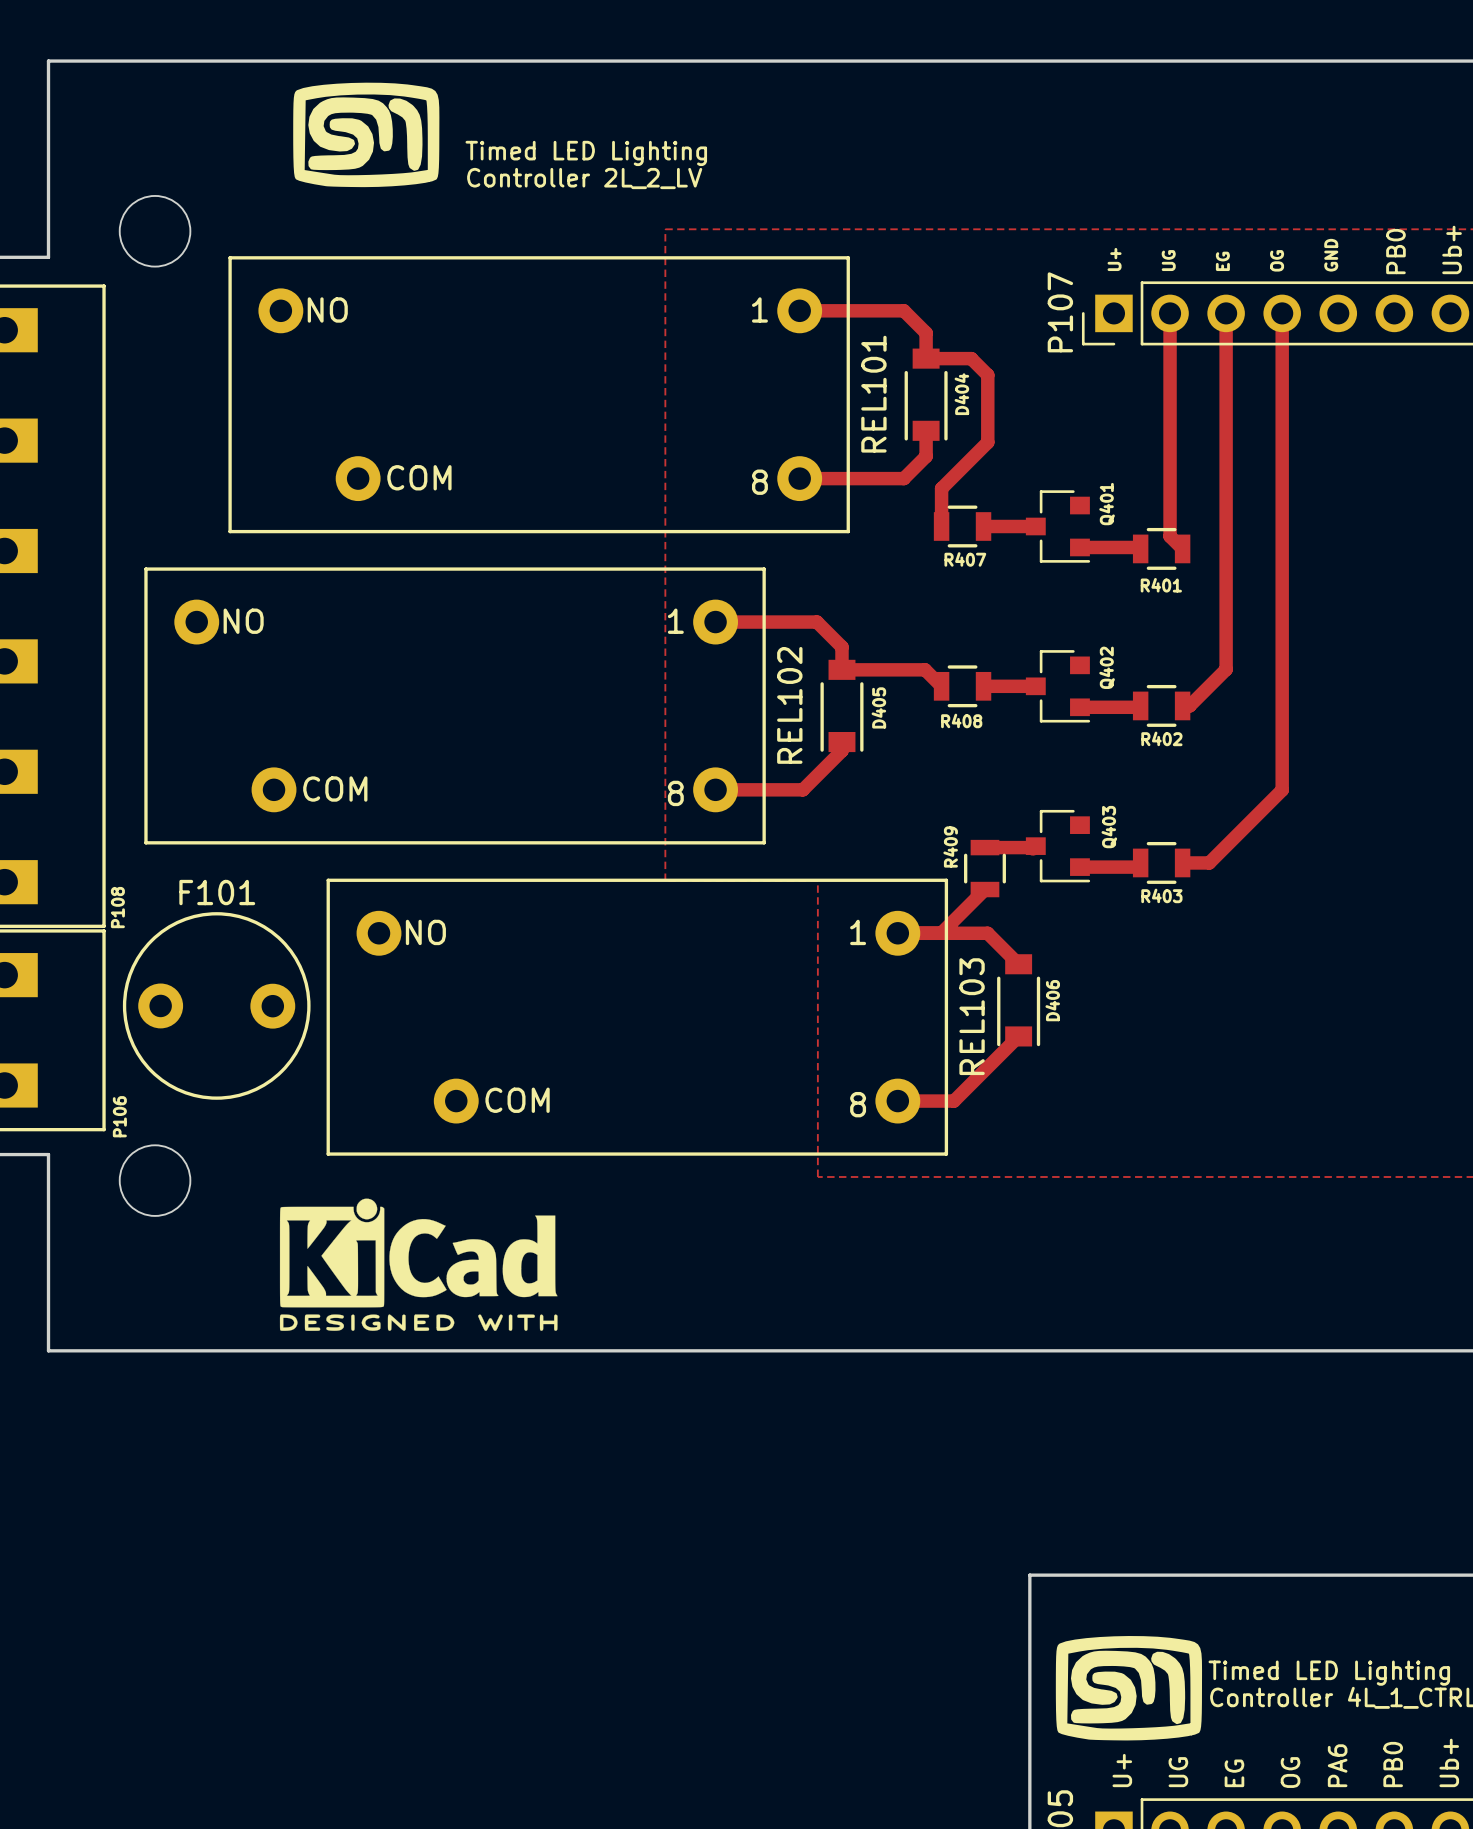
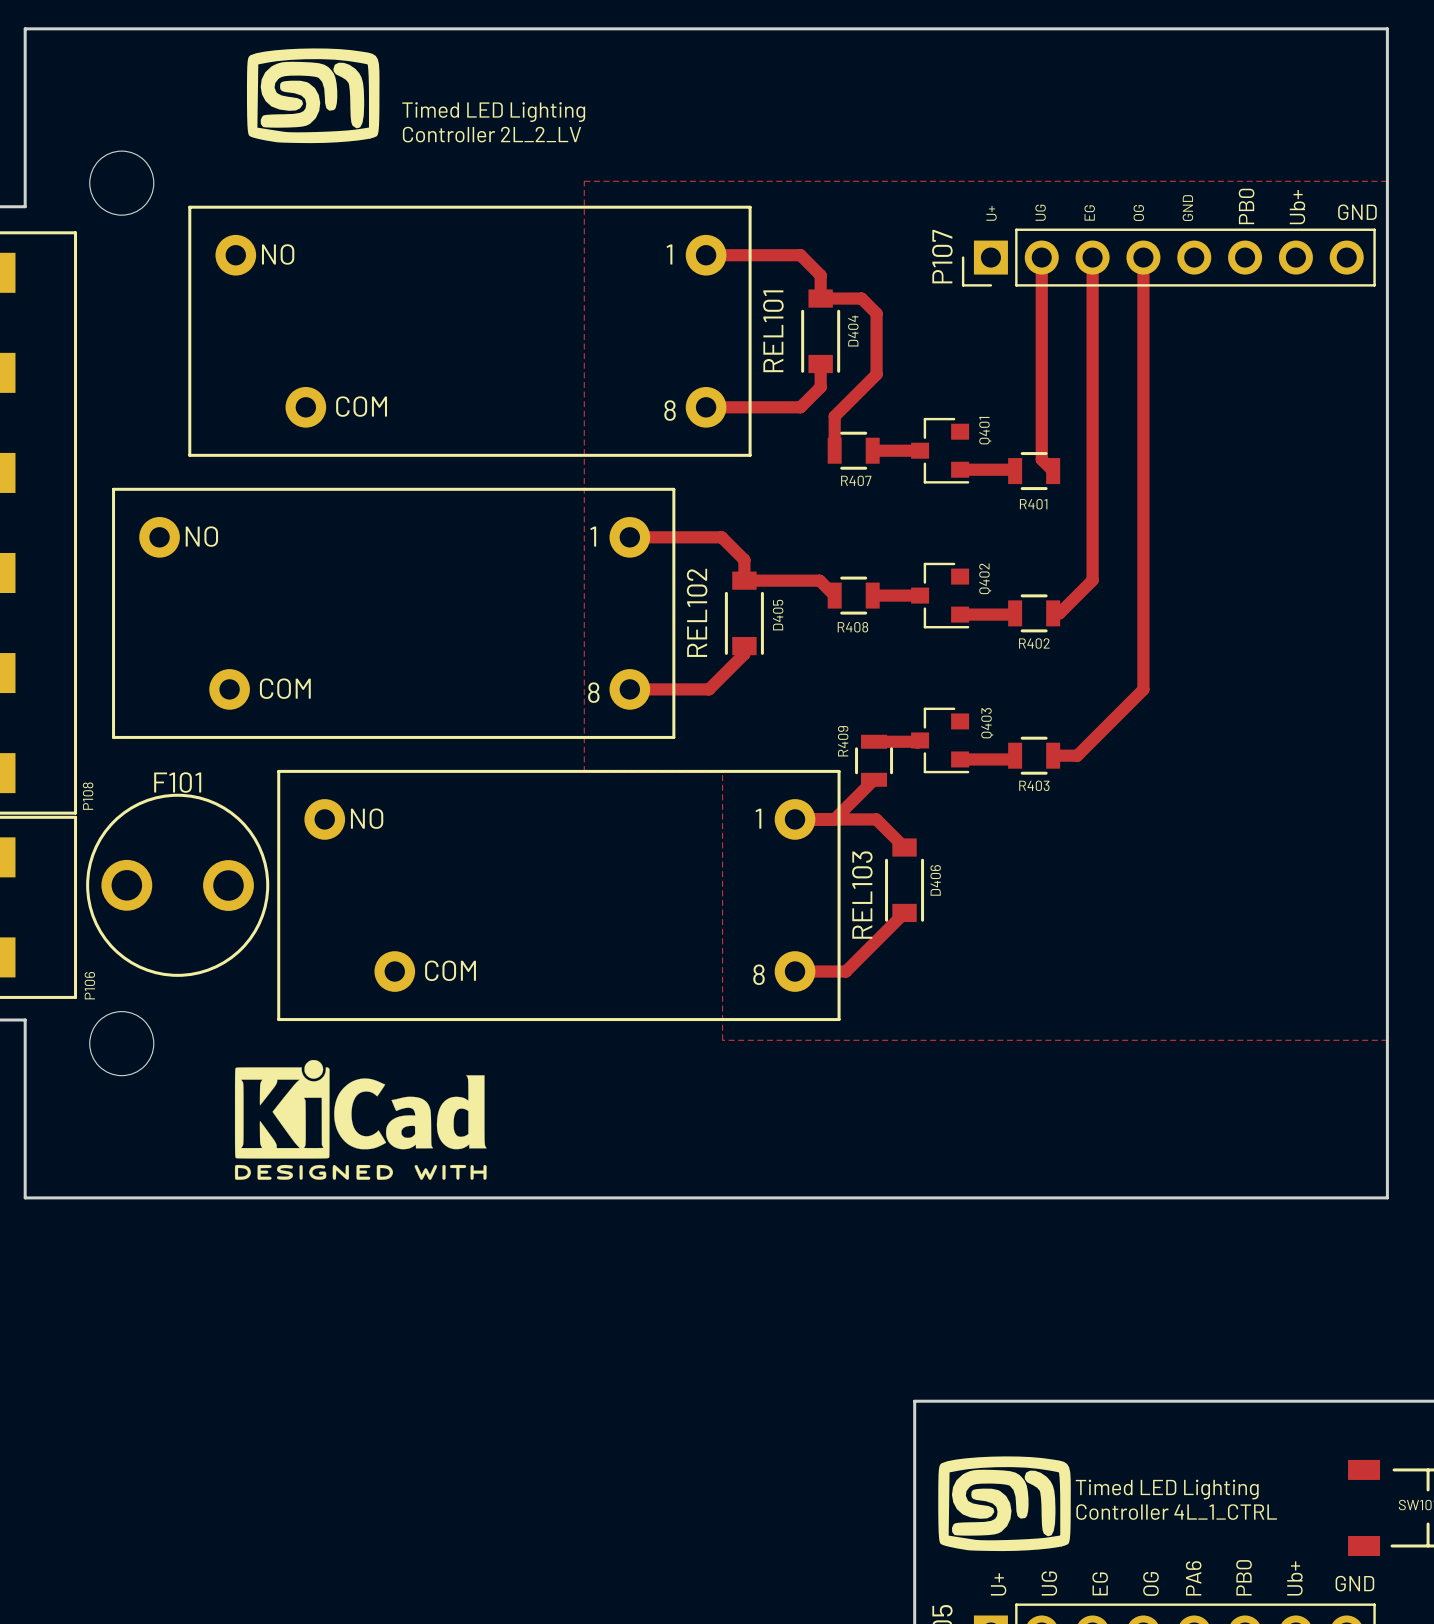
F101 footprint: [122, 912, 311, 1100] -> [86, 793, 270, 977]

